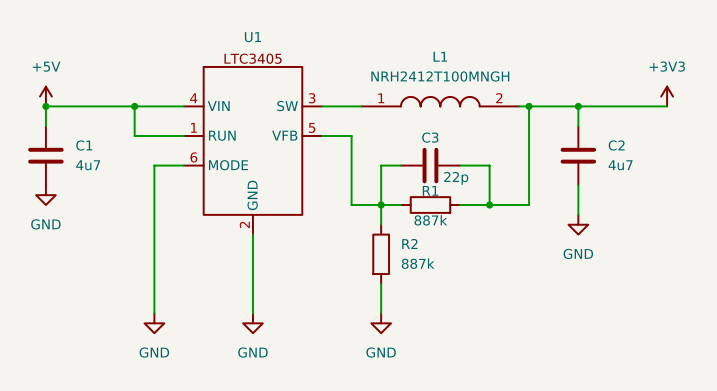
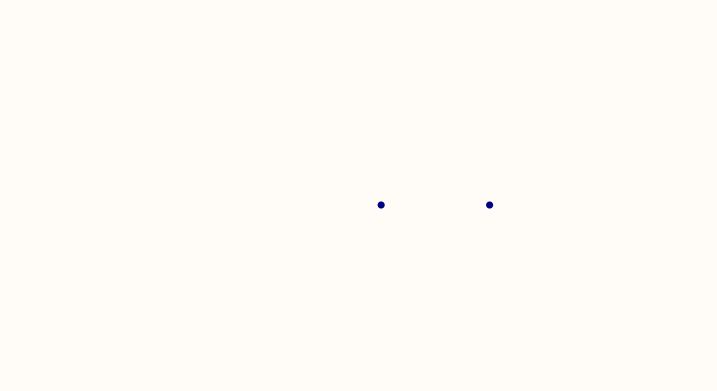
power symbol: +5V (45, 96) -> none
power symbol: +3V3 (667, 96) -> none
L1: NRH2412T100MNGH (440, 101) -> none
junction: (45, 106) -> none
wire: (134, 106) (134, 135) (183, 135) -> none
junction: (134, 106) -> none
wire: (183, 106) (45, 106) (45, 126) -> none
wire: (322, 106) (361, 106) -> none
wire: (519, 106) (667, 106) -> none
wire: (529, 106) (529, 205) (460, 205) -> none
junction: (529, 106) -> none
wire: (578, 106) (578, 126) -> none
junction: (578, 106) -> none
wire: (322, 135) (351, 135) (351, 205) (400, 205) -> none
U1: (252, 150) -> none
C1: 4u7 (45, 155) -> none
C2: 4u7 (578, 155) -> none
wire: (183, 165) (154, 165) (154, 313) -> none
wire: (400, 165) (381, 165) (381, 224) -> none
C3: 22p (430, 165) -> none
wire: (460, 165) (489, 165) (489, 205) -> none
wire: (578, 185) (578, 214) -> none
power symbol: GND (45, 195) -> none
R1: 887k (430, 205) -> none
power symbol: GND (578, 224) -> none
wire: (252, 234) (252, 313) -> none
R2: 887k (381, 254) -> none
wire: (381, 283) (381, 313) -> none
power symbol: GND (154, 323) -> none
power symbol: GND (252, 323) -> none
power symbol: GND (381, 323) -> none

